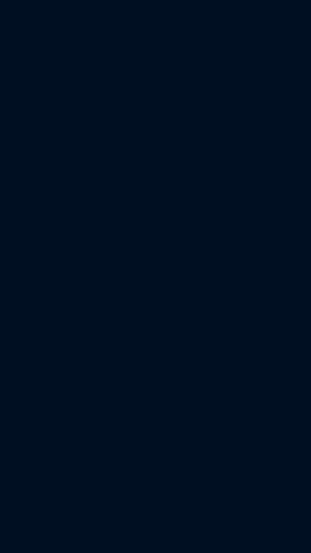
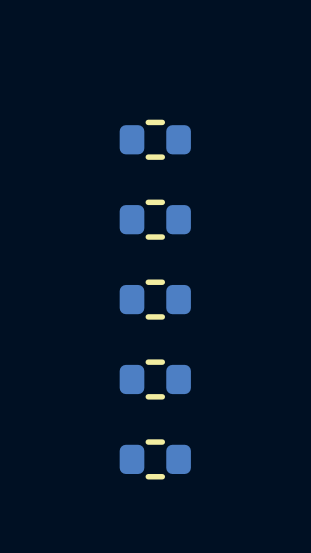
part: none -> (155, 139)
part: none -> (155, 219)
part: none -> (155, 299)
part: none -> (155, 379)
part: none -> (155, 459)

